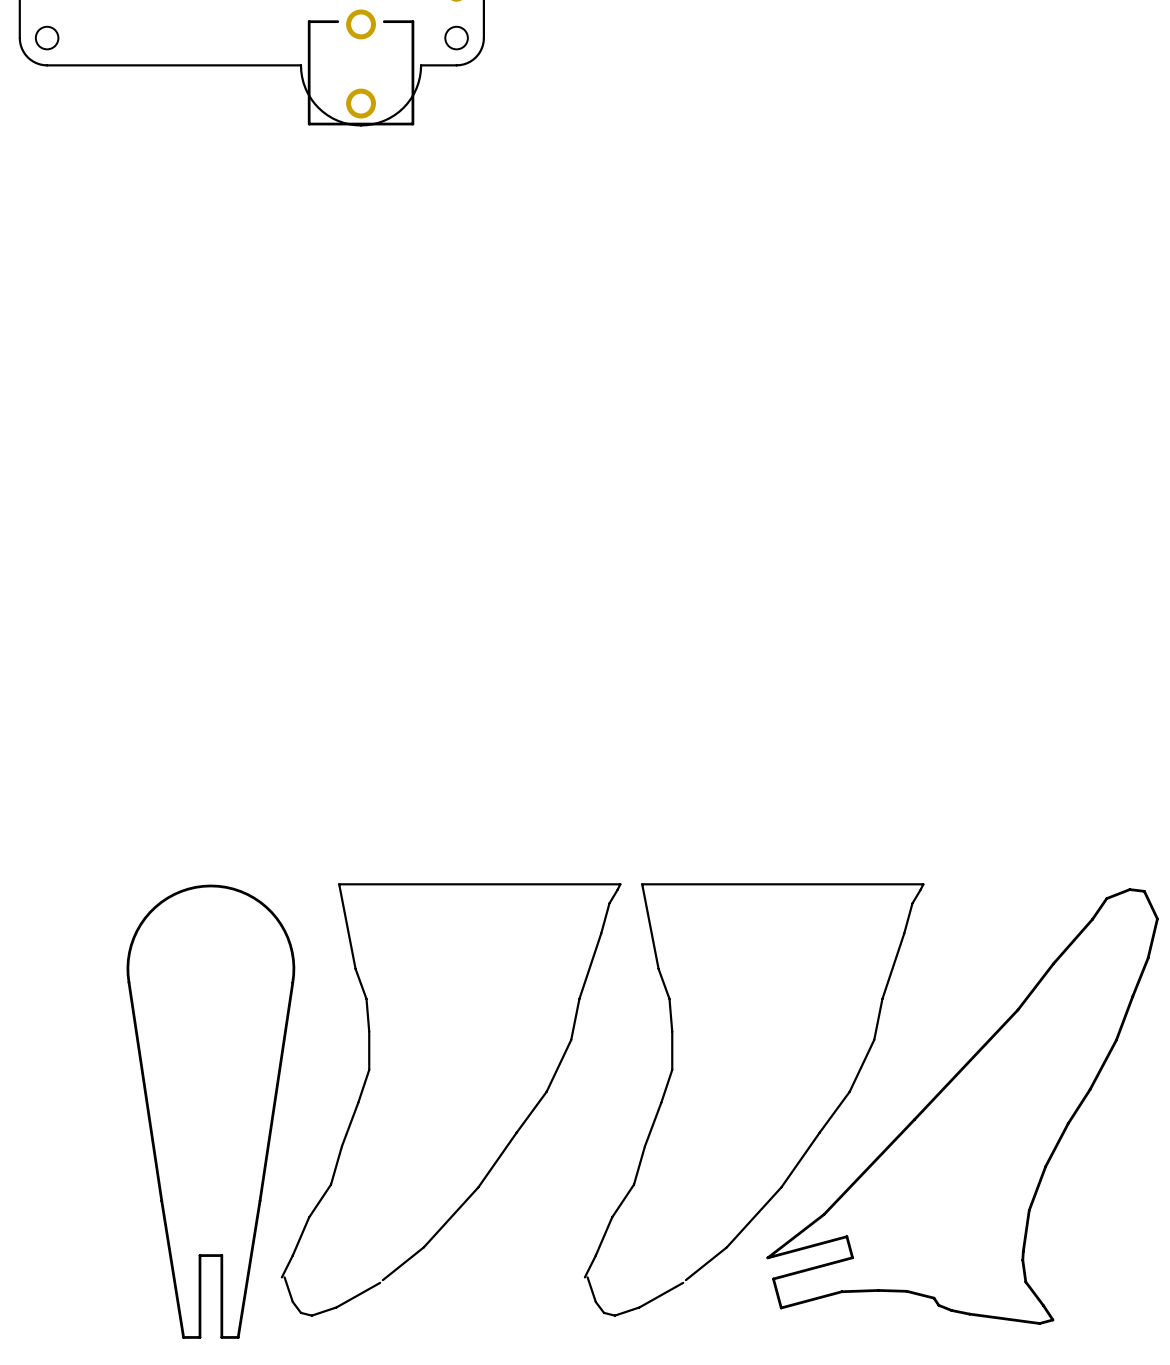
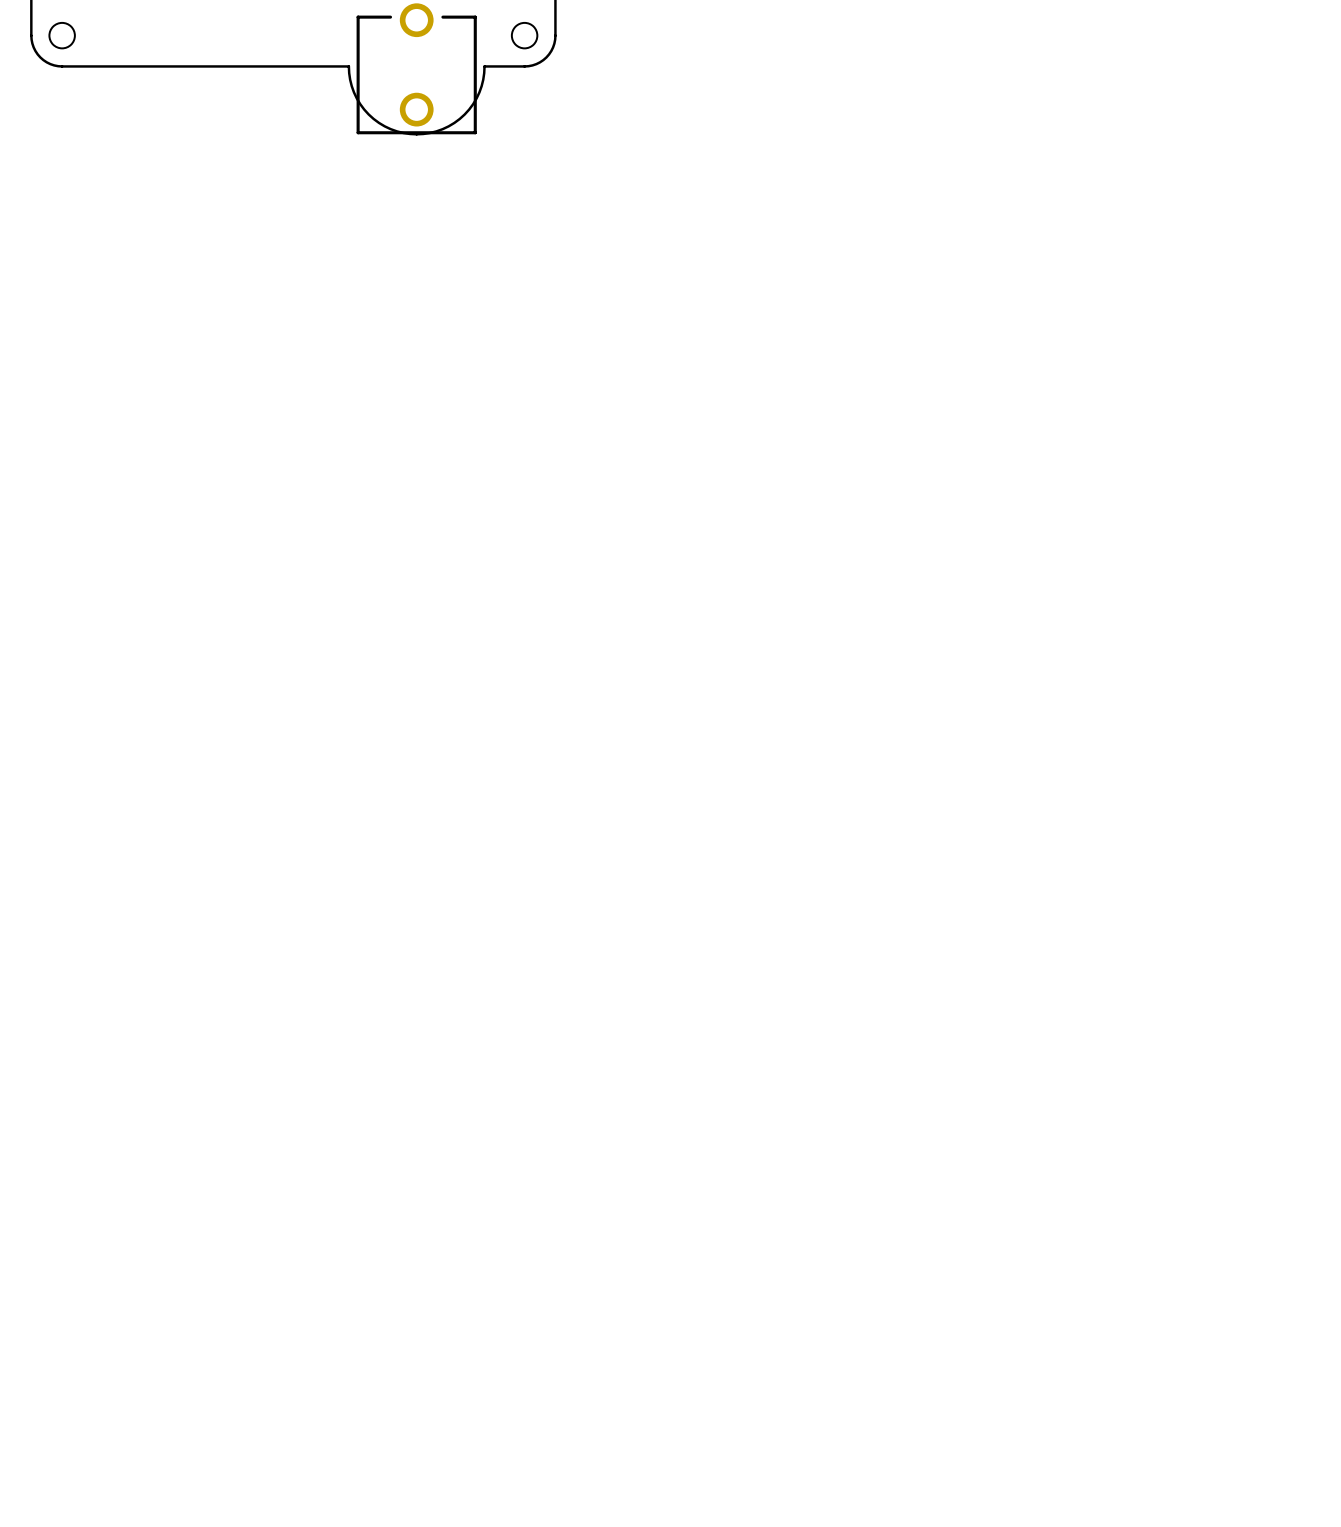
board edge: (1129, 889) (1106, 898) (1092, 919) (1053, 963) (1017, 1010) (914, 1119) (824, 1214) (767, 1257) (846, 1236) (852, 1257) (773, 1278) (781, 1307) (841, 1291) (906, 1291) (934, 1298) (938, 1305) (969, 1314) (1039, 1323) (1052, 1319) (1025, 1282) (1022, 1260) (1029, 1210) (1045, 1166) (1116, 1040) (1148, 958) (1157, 918) (1144, 891) (1129, 889) -> none
board edge: (292, 982) (238, 1337) (221, 1337) (221, 1255) (199, 1255) (199, 1337) (183, 1337) (129, 982) (127, 967) (131, 945) (145, 918) (167, 898) (195, 887) (225, 887) (240, 891) (260, 902) (280, 924) (292, 952) (292, 982) -> none
board edge: (281, 1277) (309, 1217) (331, 1184) (341, 1146) (369, 1069) (366, 998) (355, 968) (339, 884) (620, 884) (609, 903) (579, 998) (571, 1039) (546, 1091) (478, 1187) (423, 1247) (382, 1280) -> none
board edge: (284, 1277) (292, 1301) (300, 1312) (311, 1315) (336, 1307) (380, 1282) -> none
board edge: (584, 1277) (612, 1217) (634, 1184) (644, 1146) (672, 1069) (669, 998) (658, 968) (642, 884) (923, 884) (912, 903) (882, 998) (874, 1039) (849, 1091) (781, 1187) (726, 1247) (685, 1280) -> none
board edge: (587, 1277) (595, 1301) (604, 1312) (614, 1315) (639, 1307) (683, 1282) -> none

